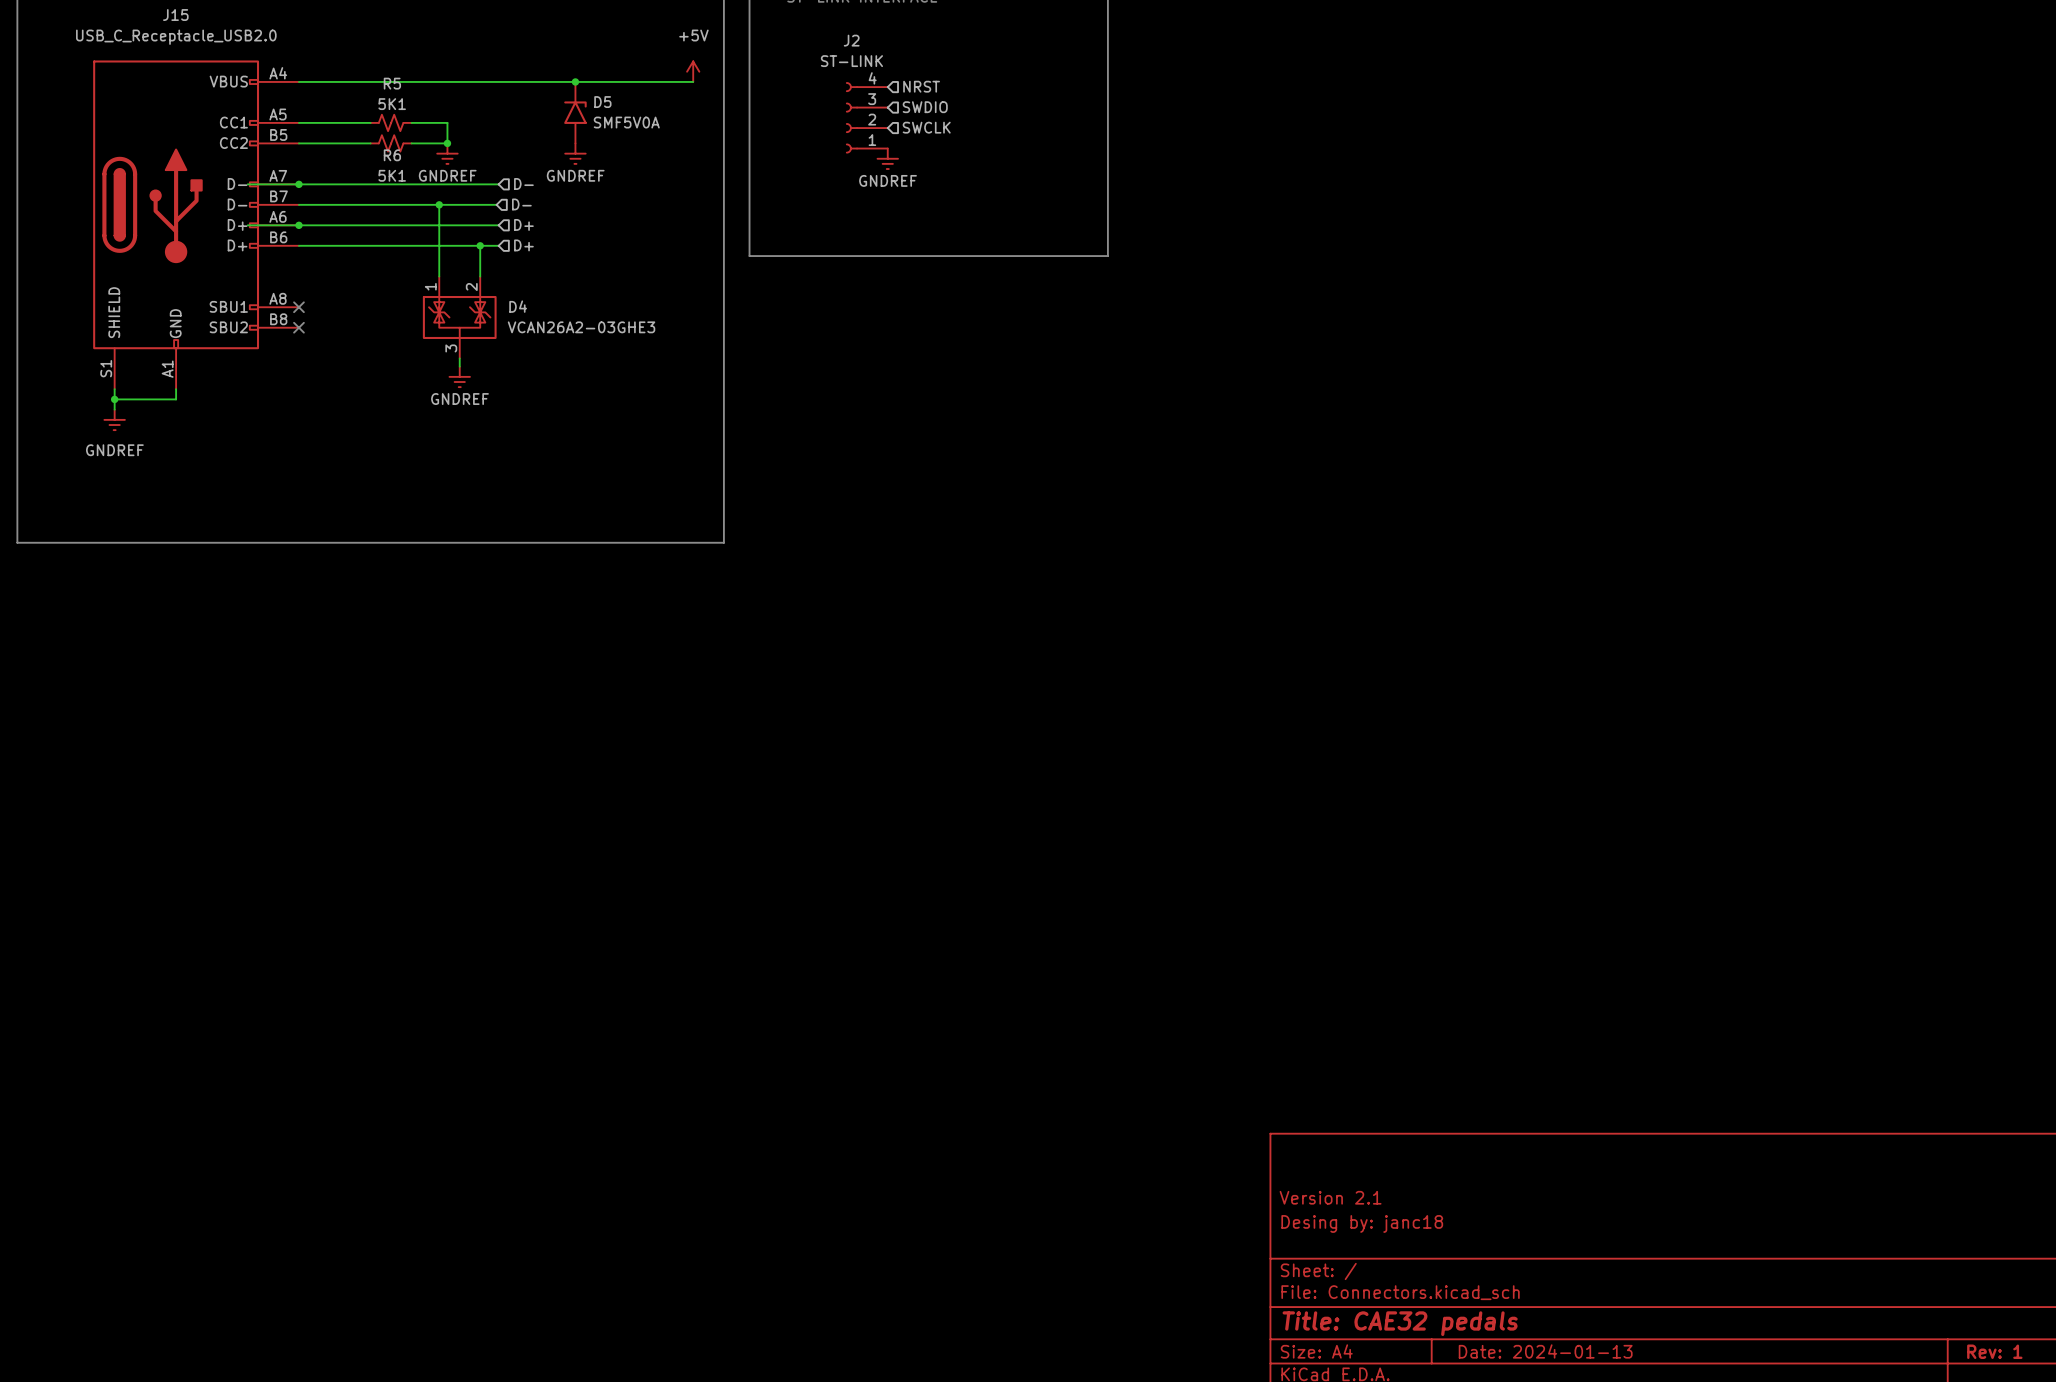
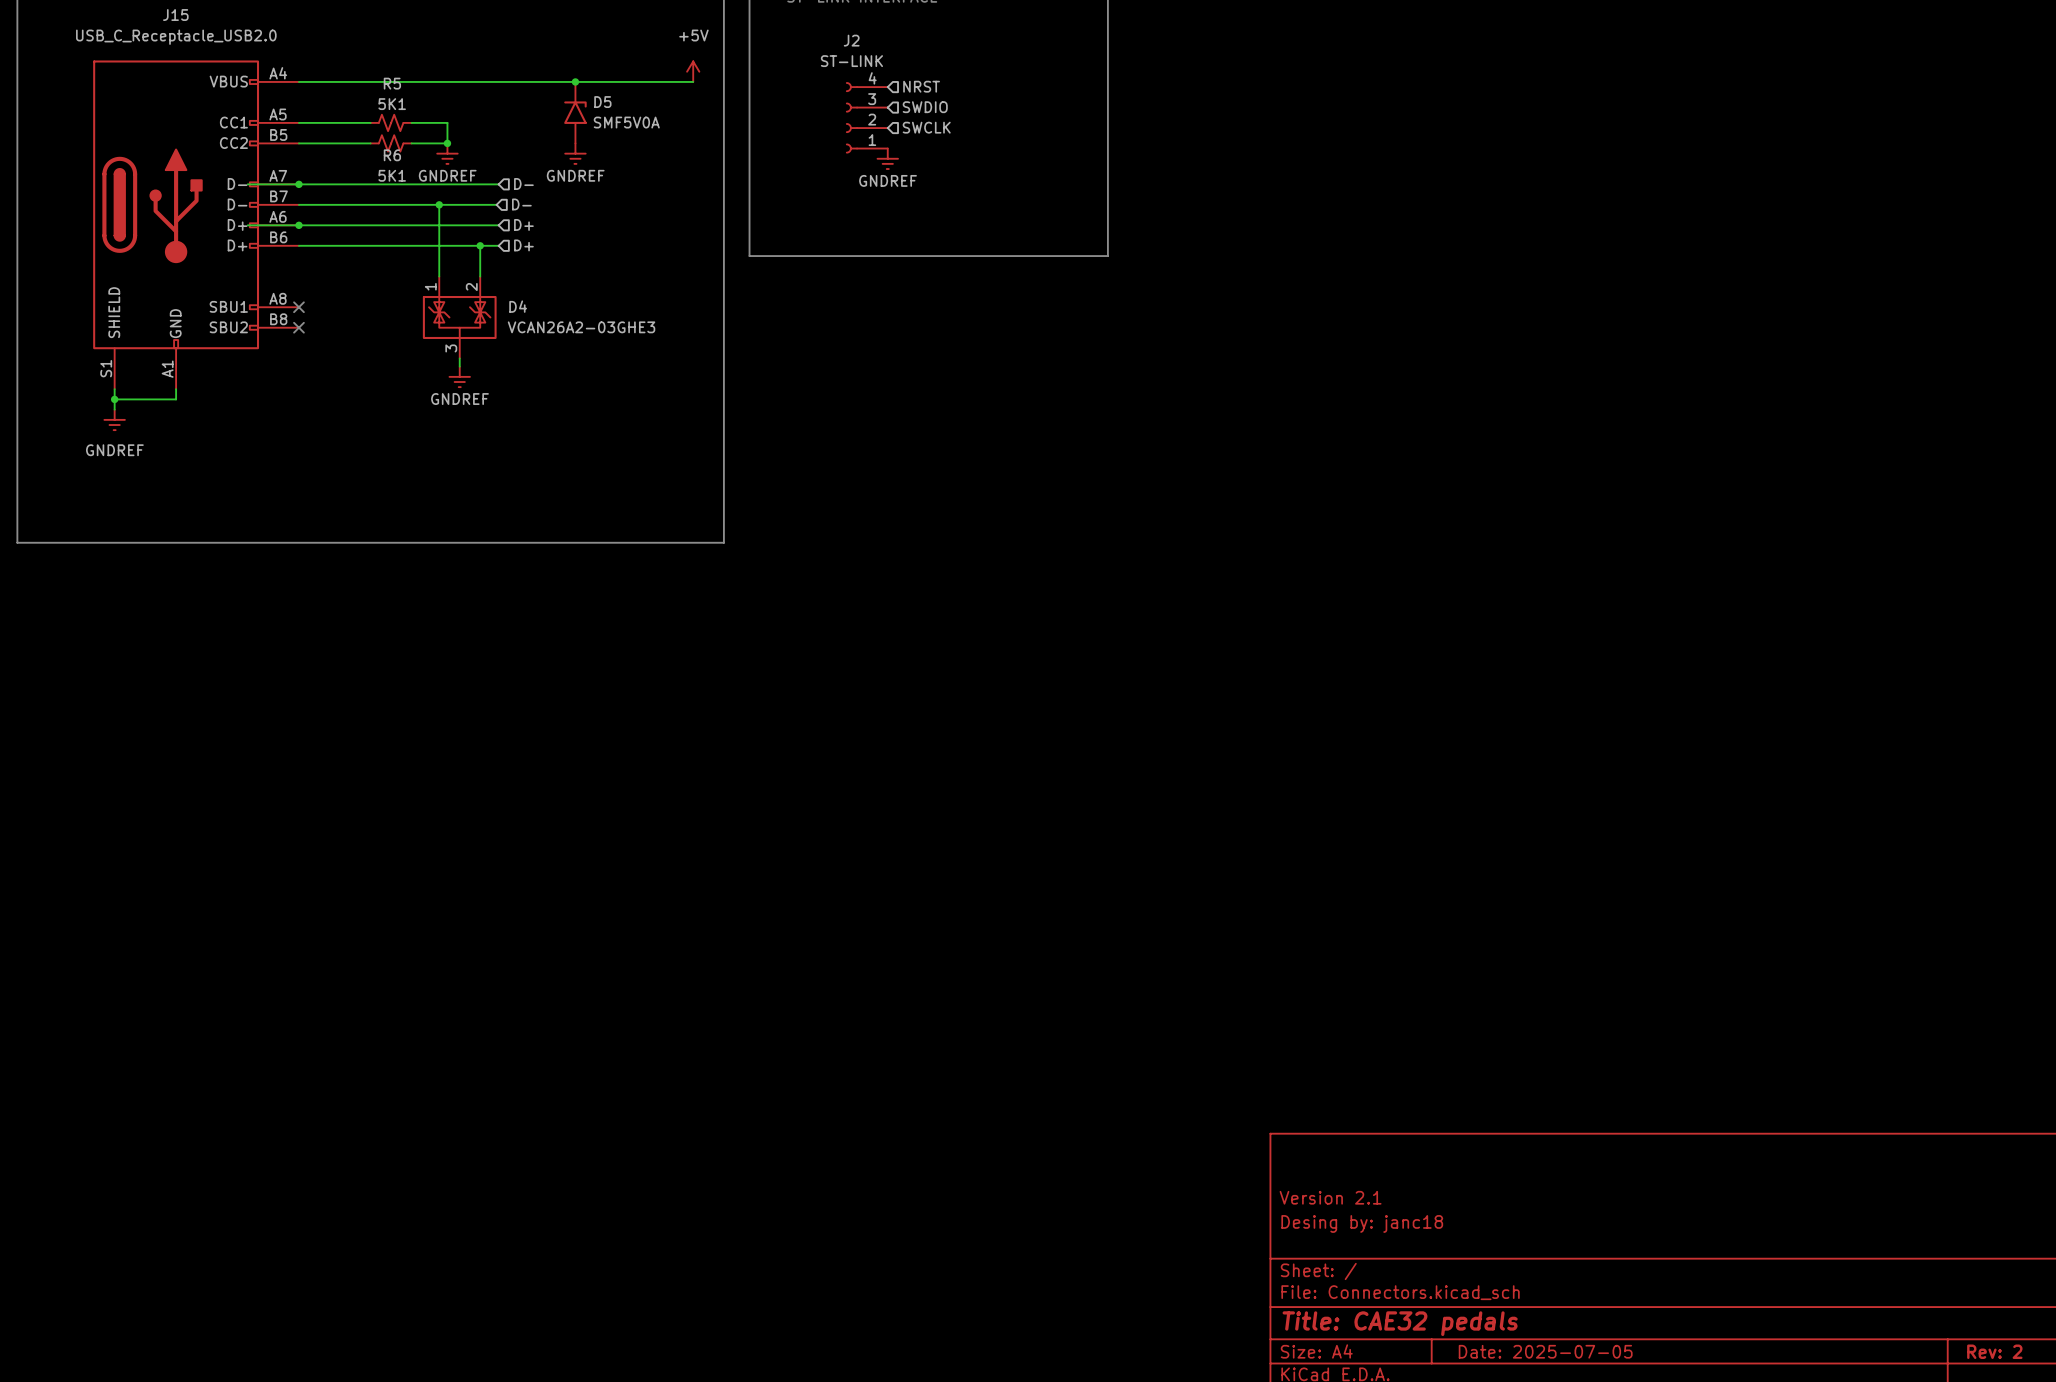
title block: Date: 2024-01-13 (1545, 1351) -> Date: 2025-07-05 (1545, 1351)
title block: Rev: 1 (1994, 1351) -> Rev: 2 (1994, 1351)

